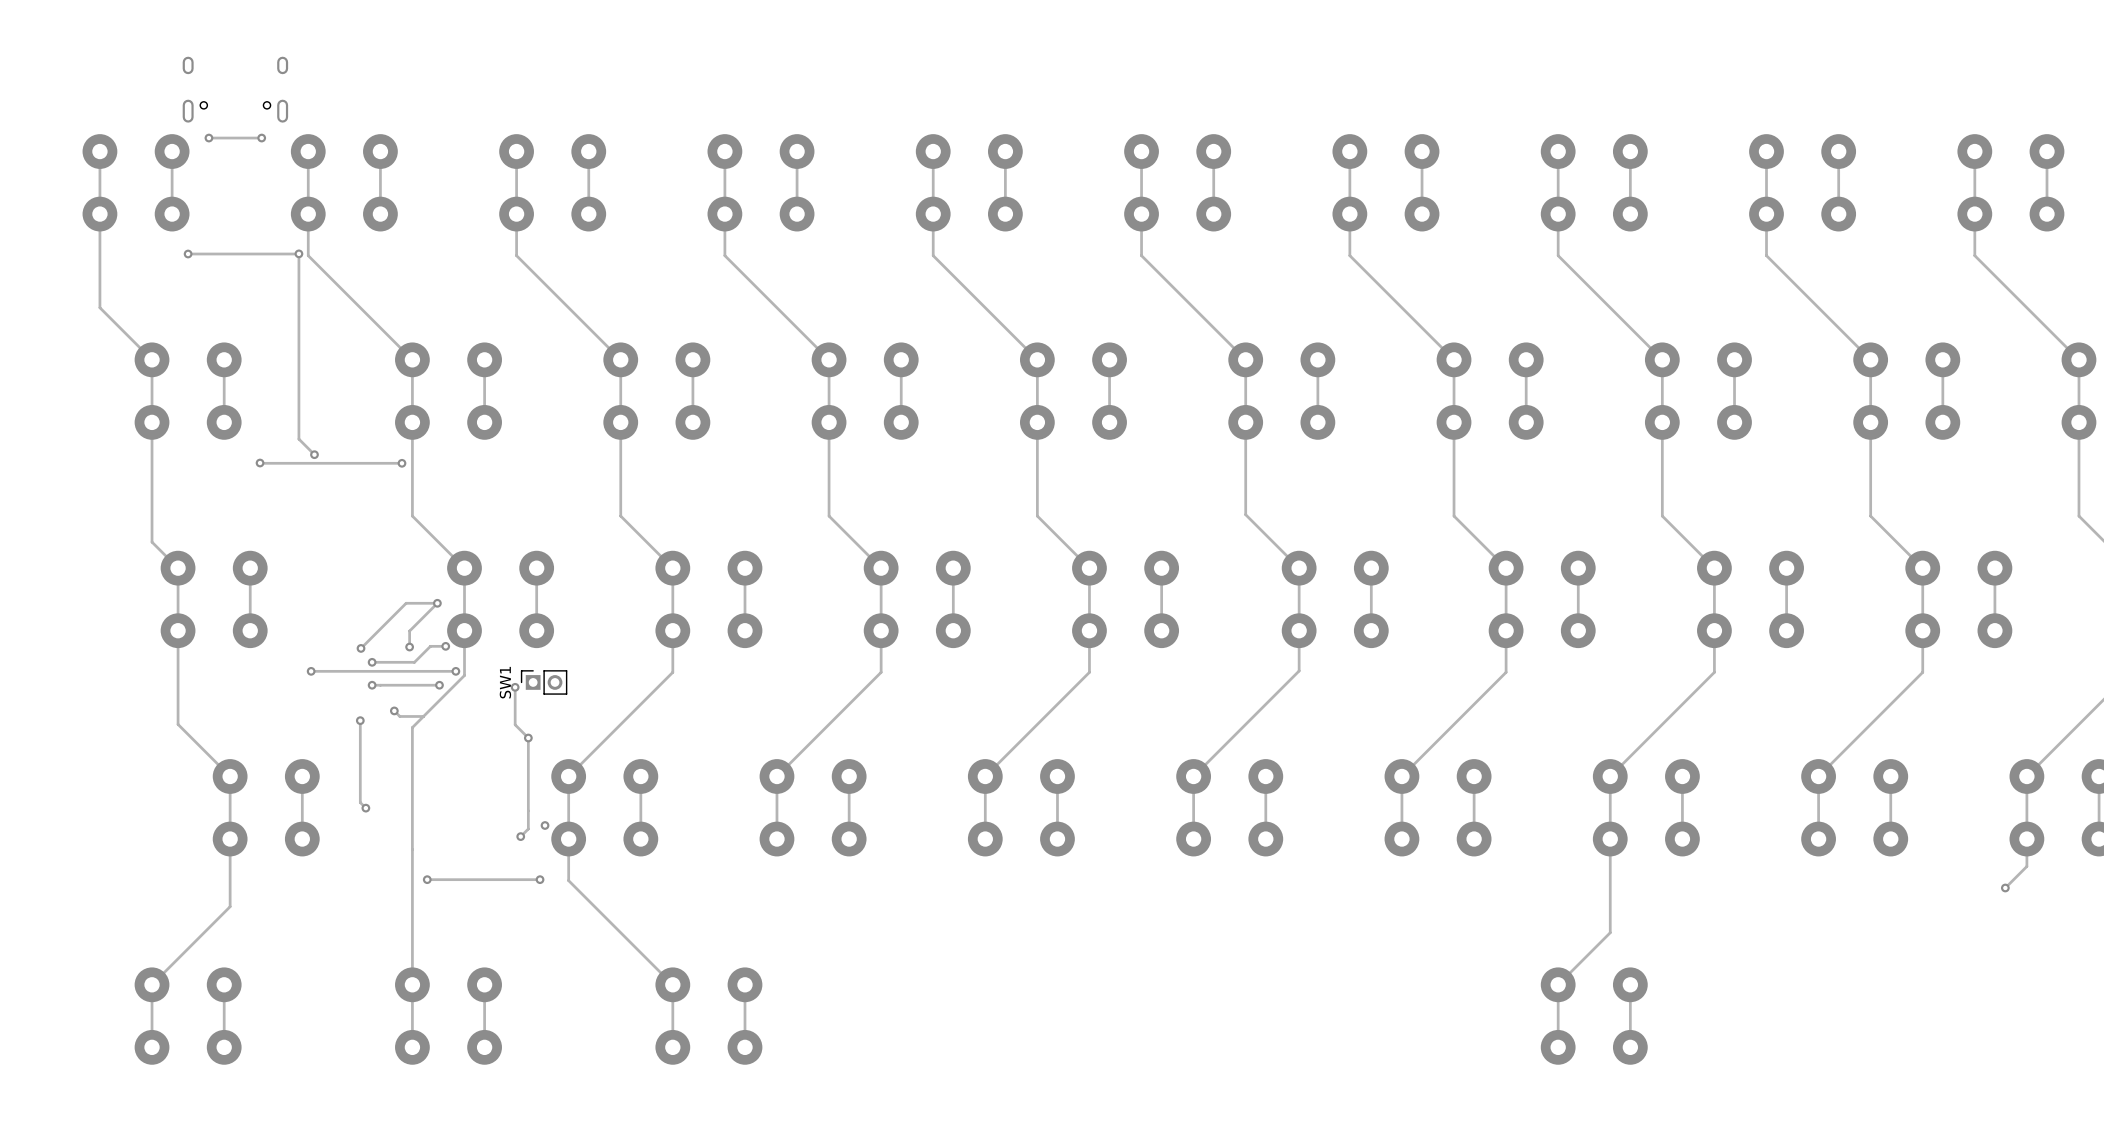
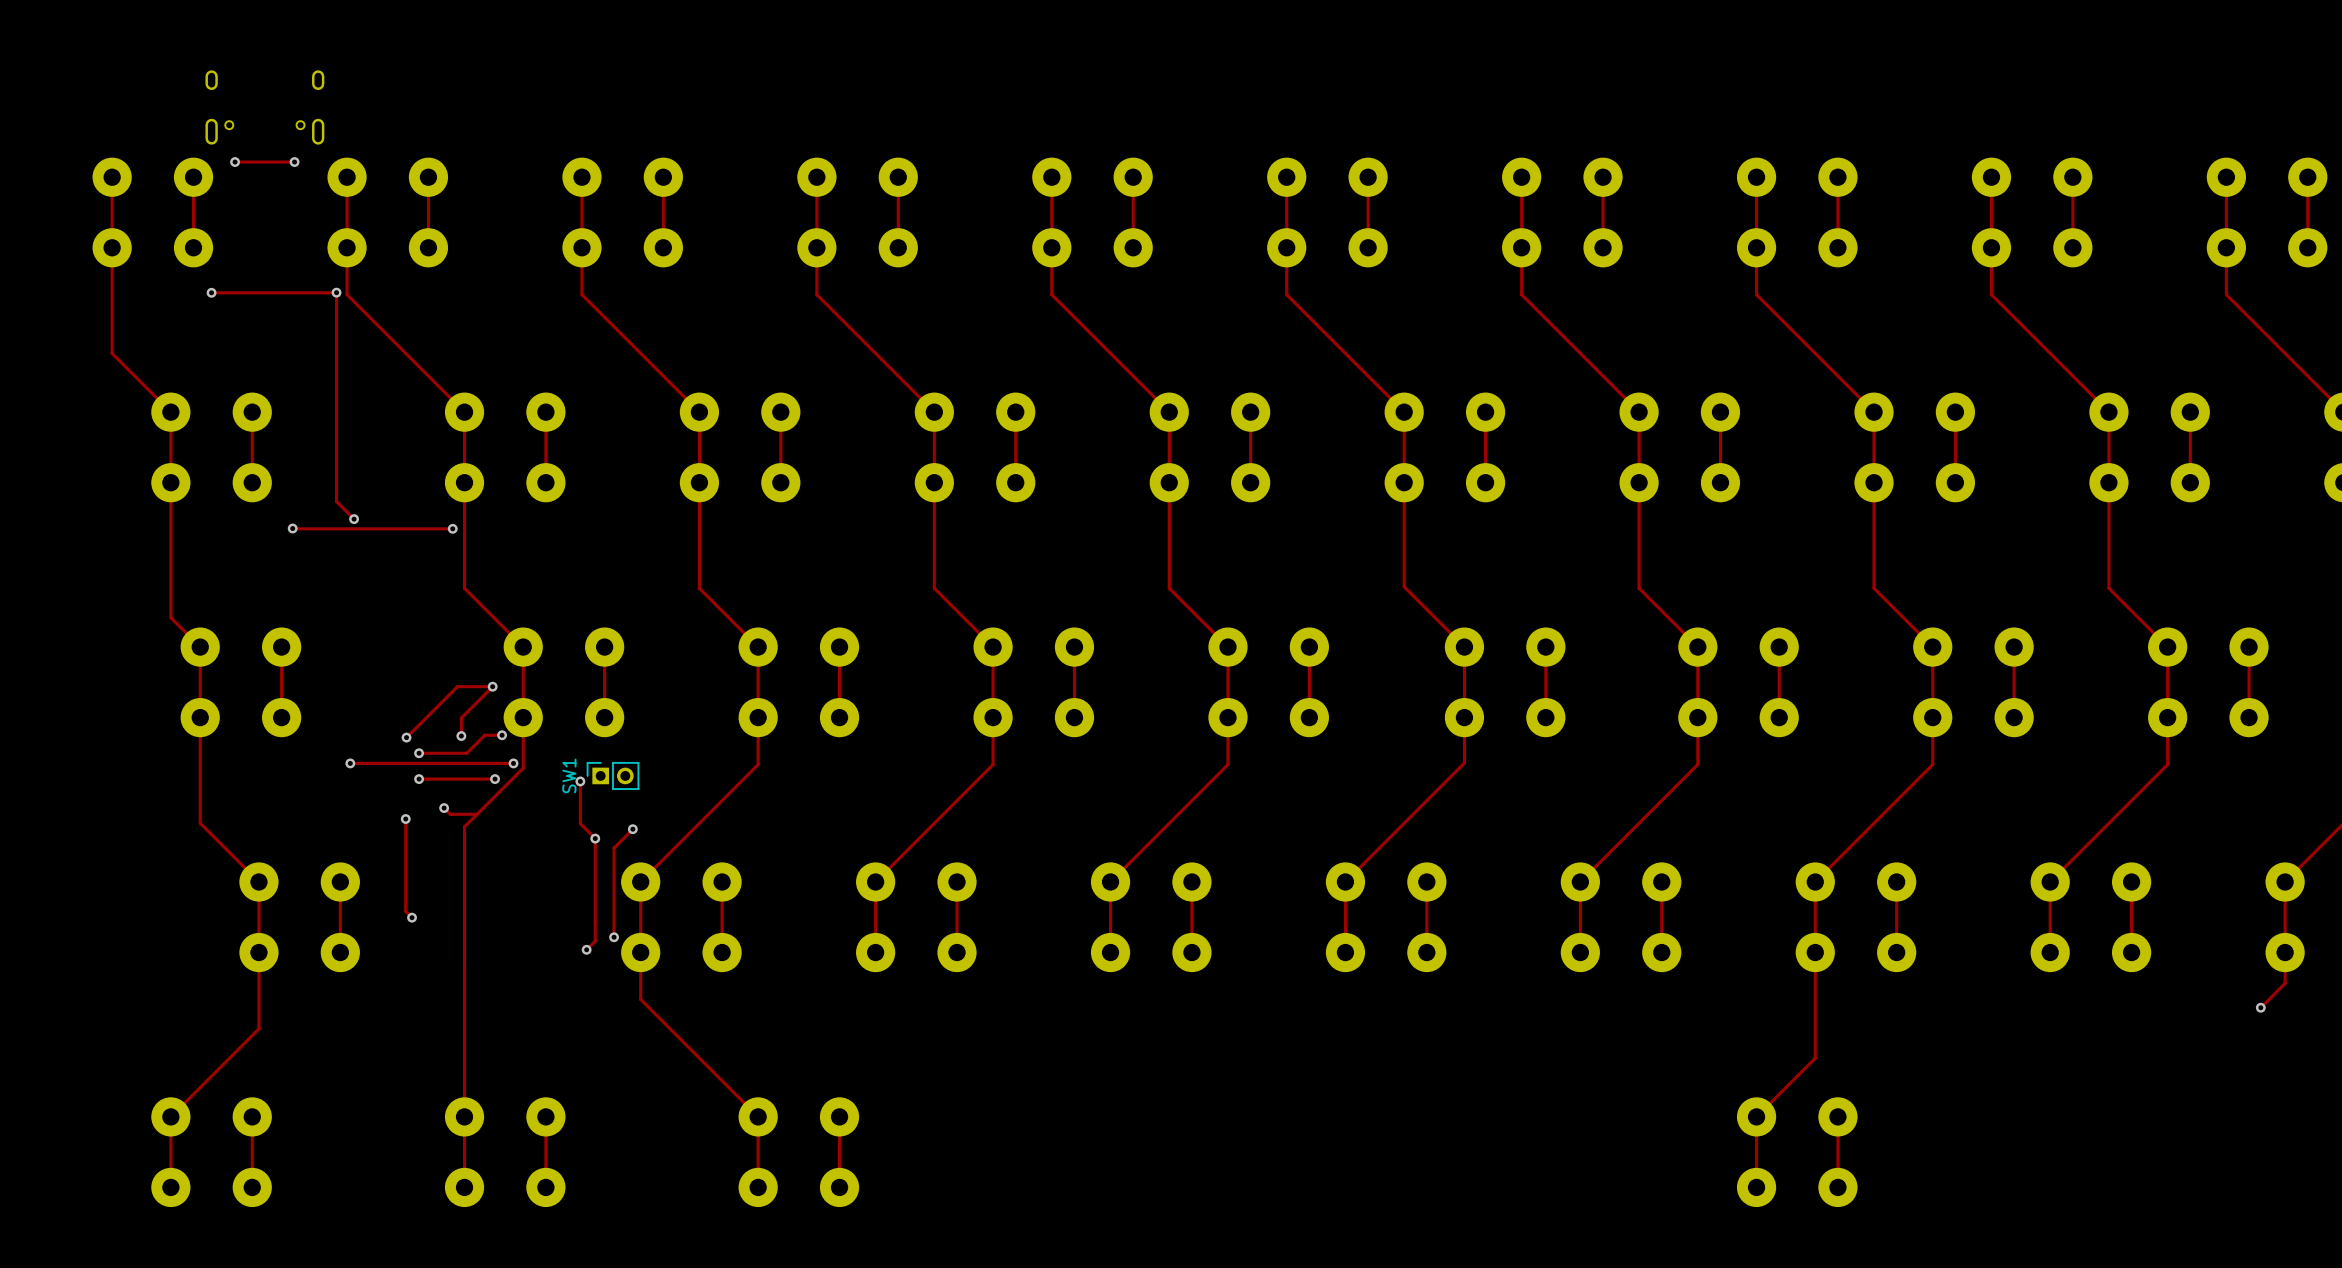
track: none -> (631, 827) (632, 829) (614, 847) (614, 937)
via: none -> (632, 829)
track: (427, 879) (540, 879) -> none
via: (427, 879) -> none
via: (540, 879) -> none

